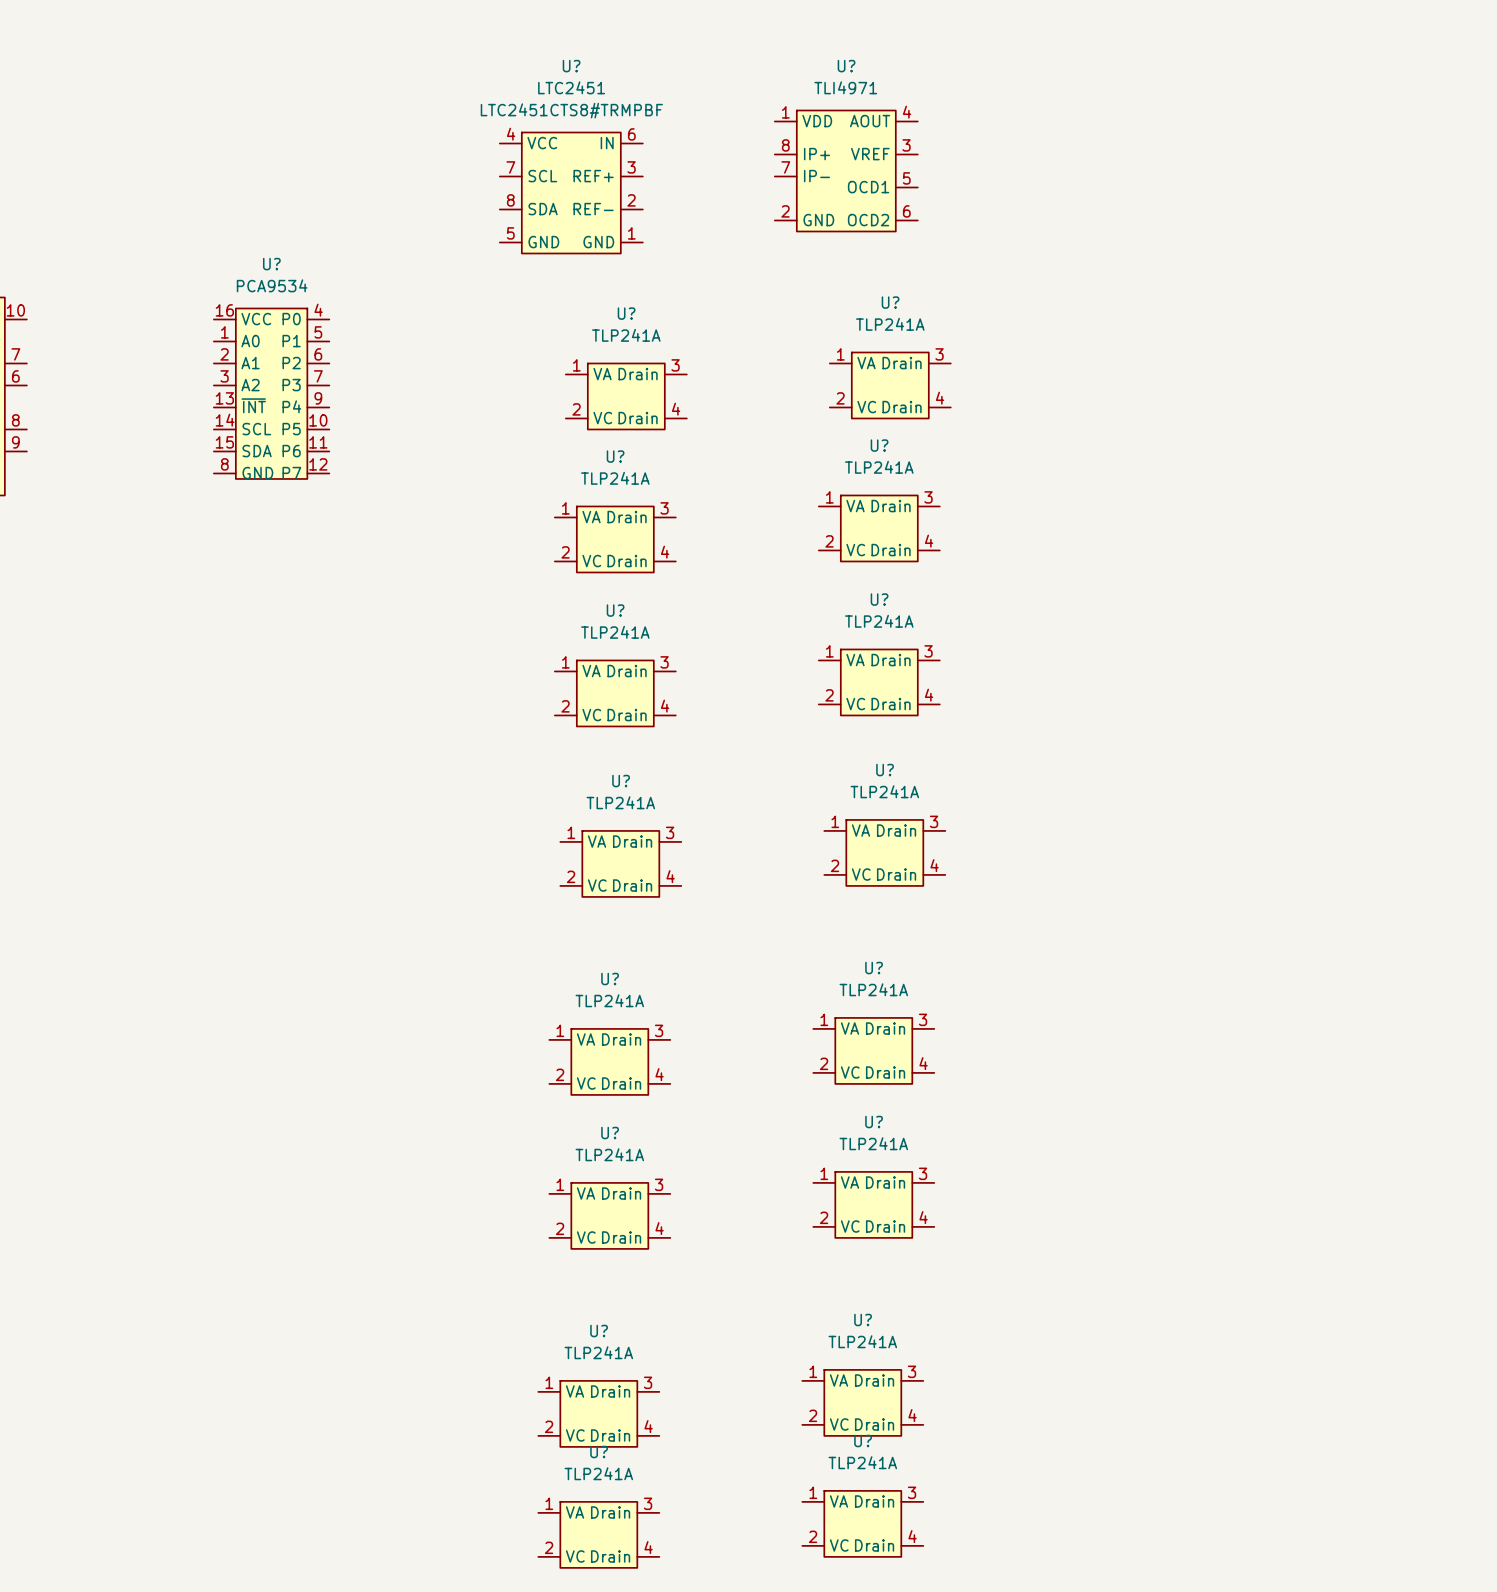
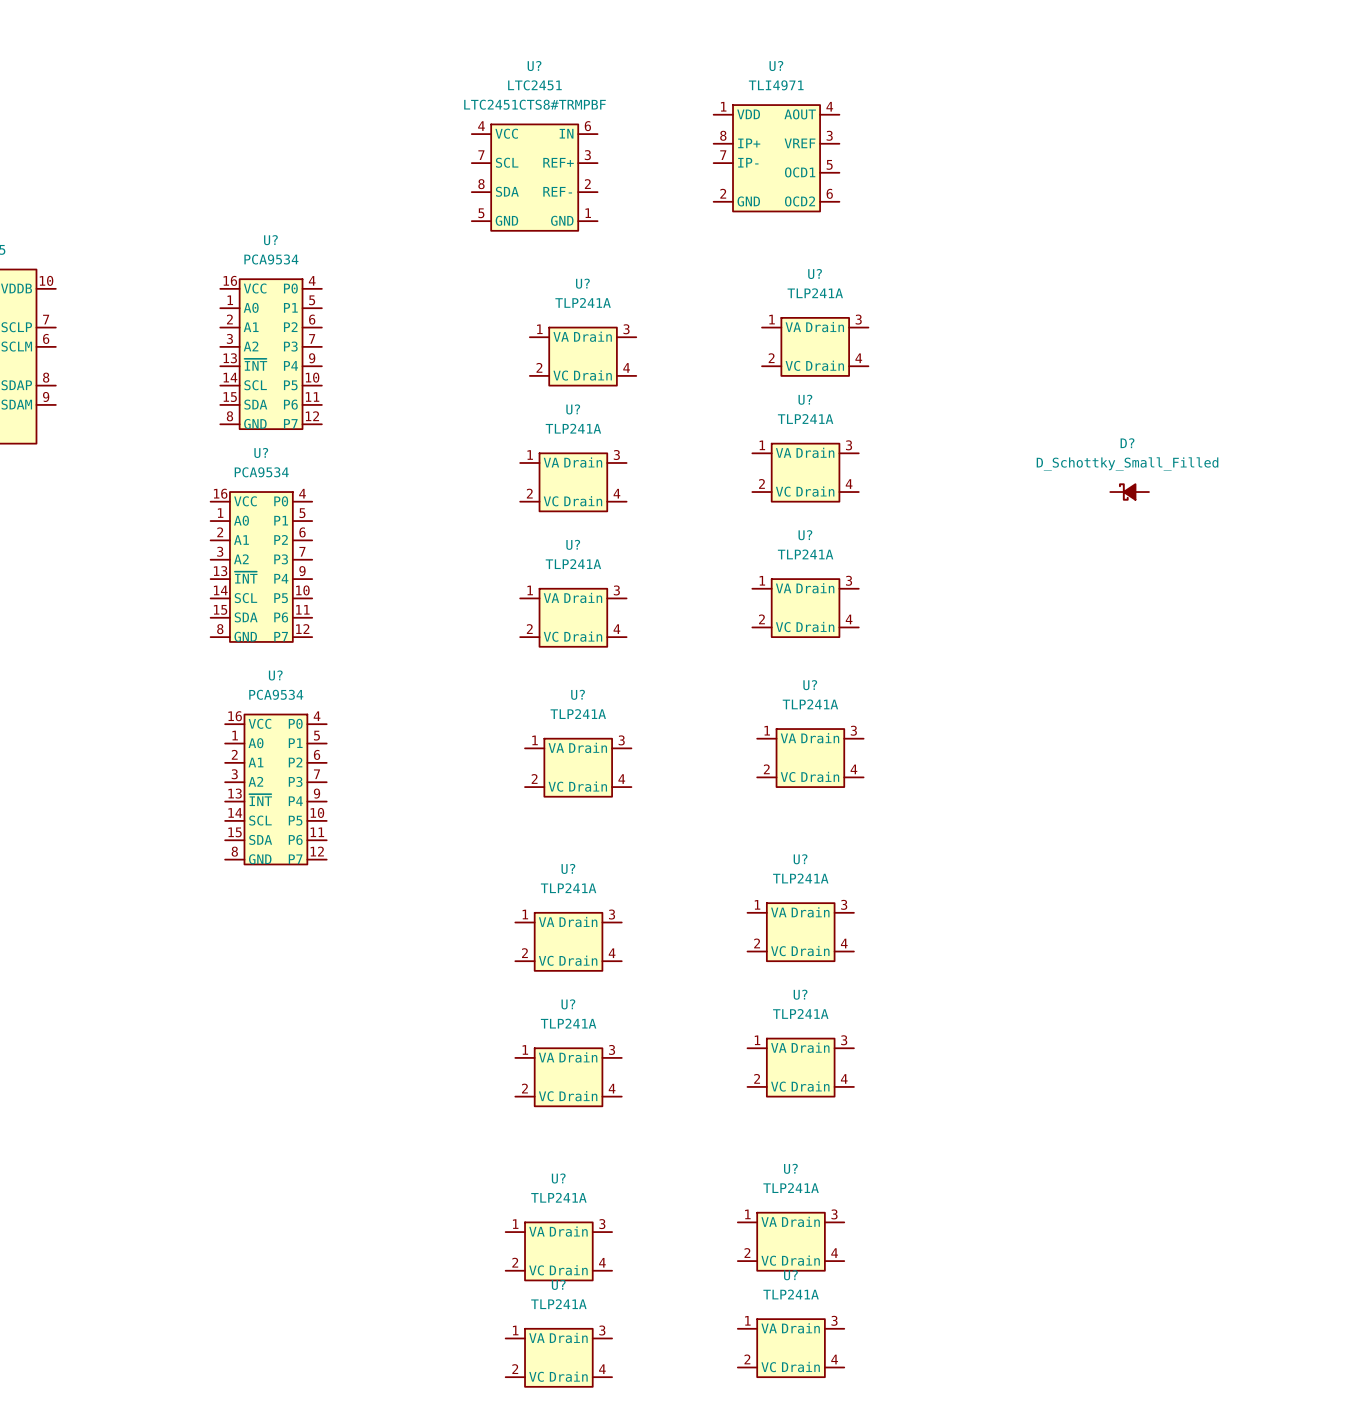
D?: none -> D_Schottky_Small_Filled (1129, 492)
U?: none -> PCA9534 (261, 566)
U?: none -> PCA9534 (275, 789)

